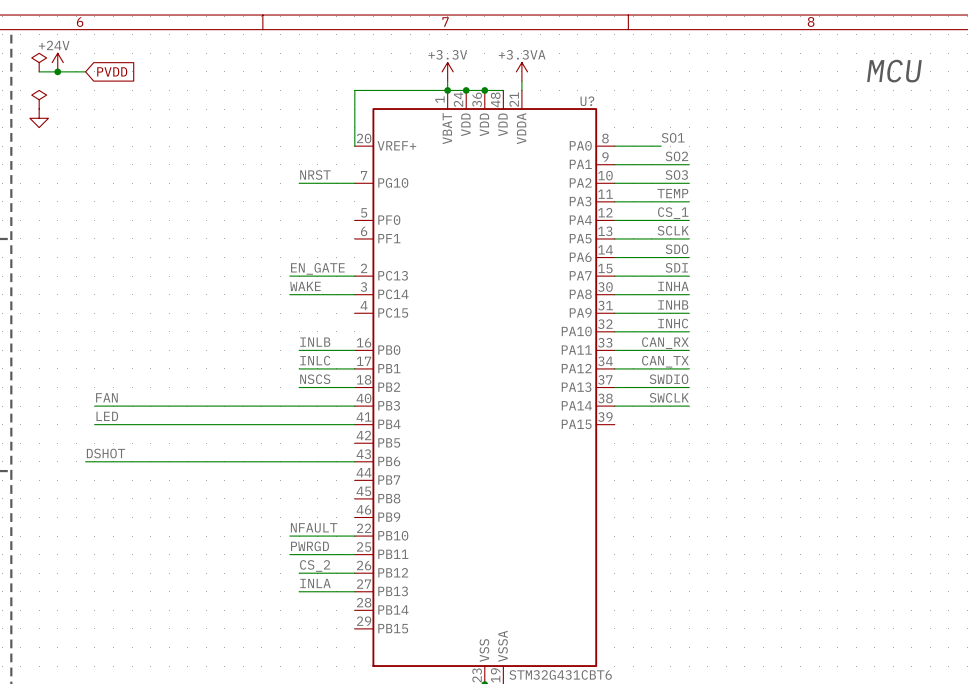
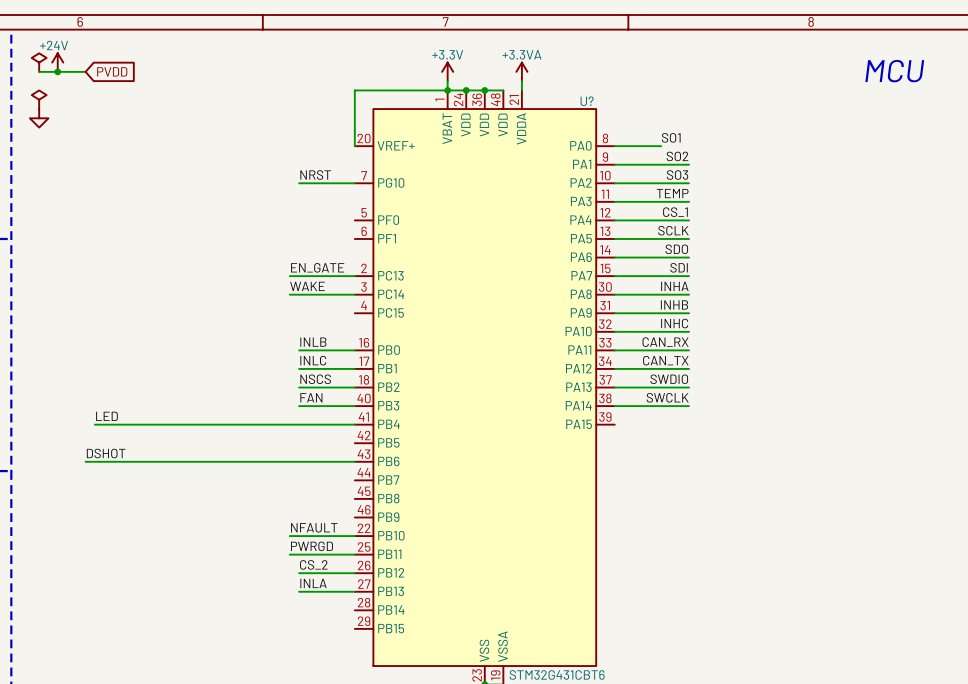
label: FAN (106, 397) -> none
label: none -> FAN (311, 397)
wire: (94, 406) (299, 406) -> none

